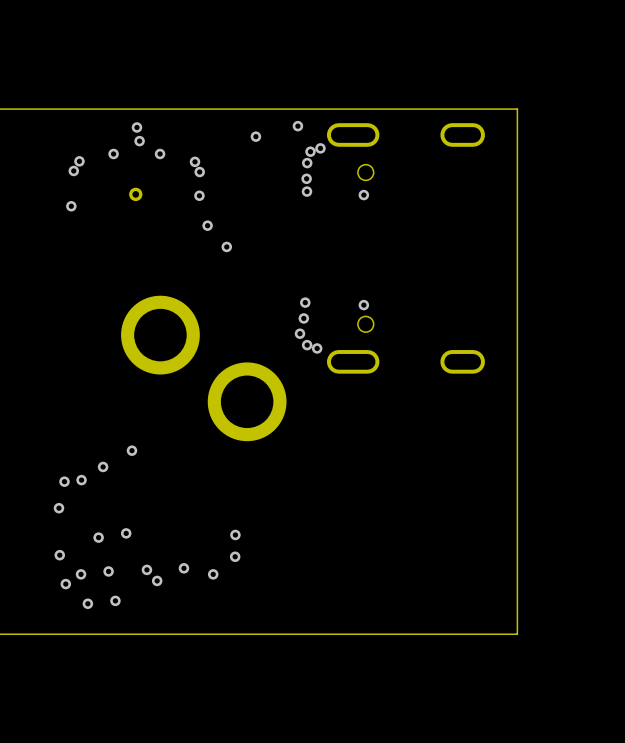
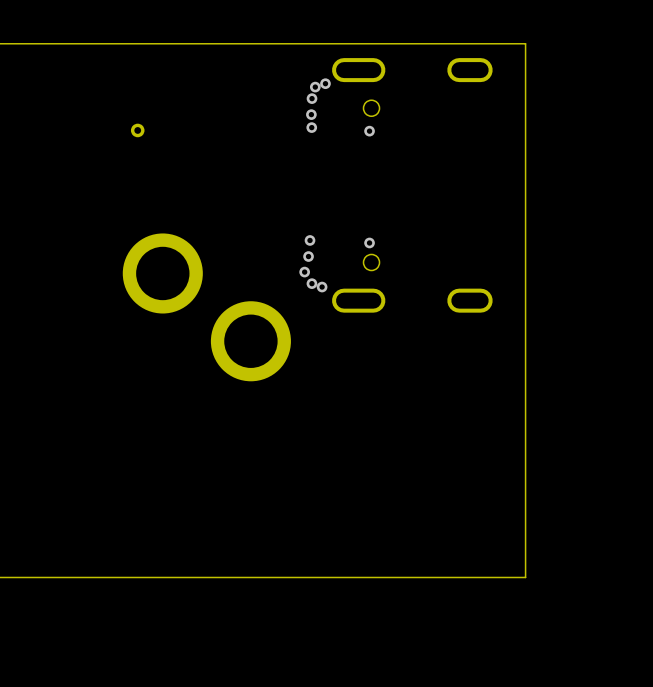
via: (297, 126) -> none
via: (136, 127) -> none
via: (255, 136) -> none
via: (139, 141) -> none
via: (113, 153) -> none
via: (160, 153) -> none
via: (79, 161) -> none
via: (194, 161) -> none
via: (73, 170) -> none
via: (199, 172) -> none
via: (199, 195) -> none
via: (71, 206) -> none
via: (207, 225) -> none
via: (226, 246) -> none
via: (131, 450) -> none
via: (103, 466) -> none
via: (81, 480) -> none
via: (64, 481) -> none
via: (58, 508) -> none
via: (126, 533) -> none
via: (235, 534) -> none
via: (98, 537) -> none
via: (59, 555) -> none
via: (235, 556) -> none
via: (183, 568) -> none
via: (146, 569) -> none
via: (108, 571) -> none
via: (81, 574) -> none
via: (213, 574) -> none
via: (157, 580) -> none
via: (65, 584) -> none
via: (115, 600) -> none
via: (87, 603) -> none

